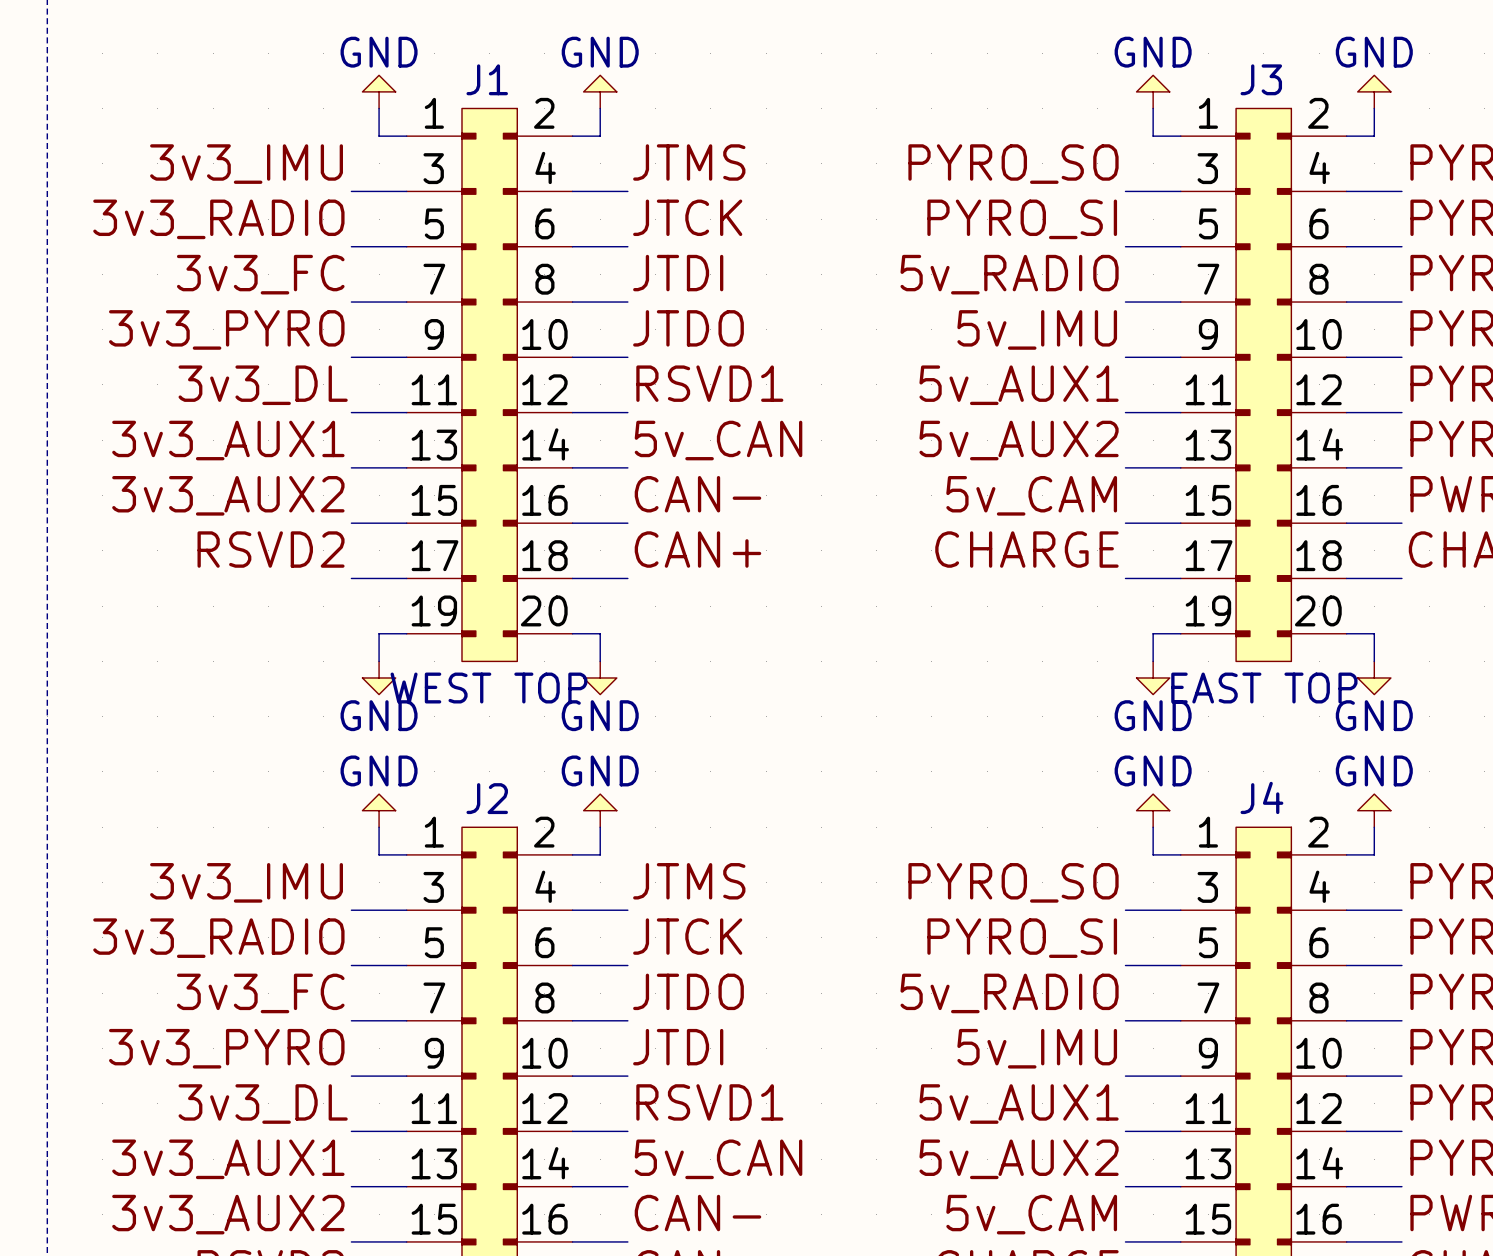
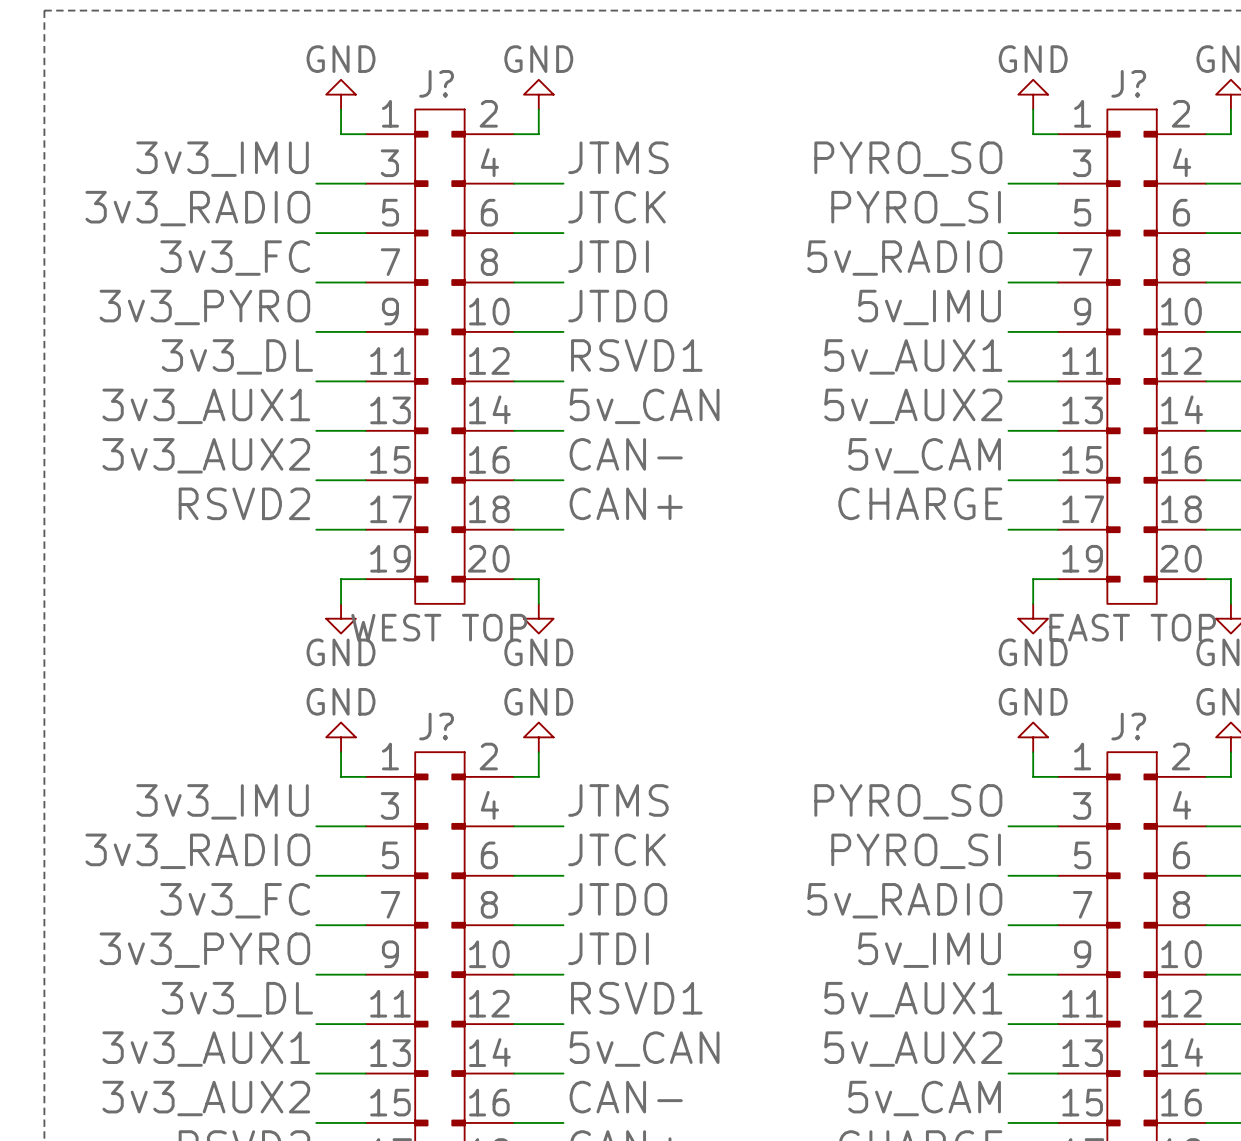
J1 name: J1 (487, 79) -> J? (436, 83)
J3 name: J3 (1261, 79) -> J? (1128, 83)
J4 name: J4 (1261, 797) -> J? (1128, 726)
J2 name: J2 (487, 798) -> J? (436, 726)

